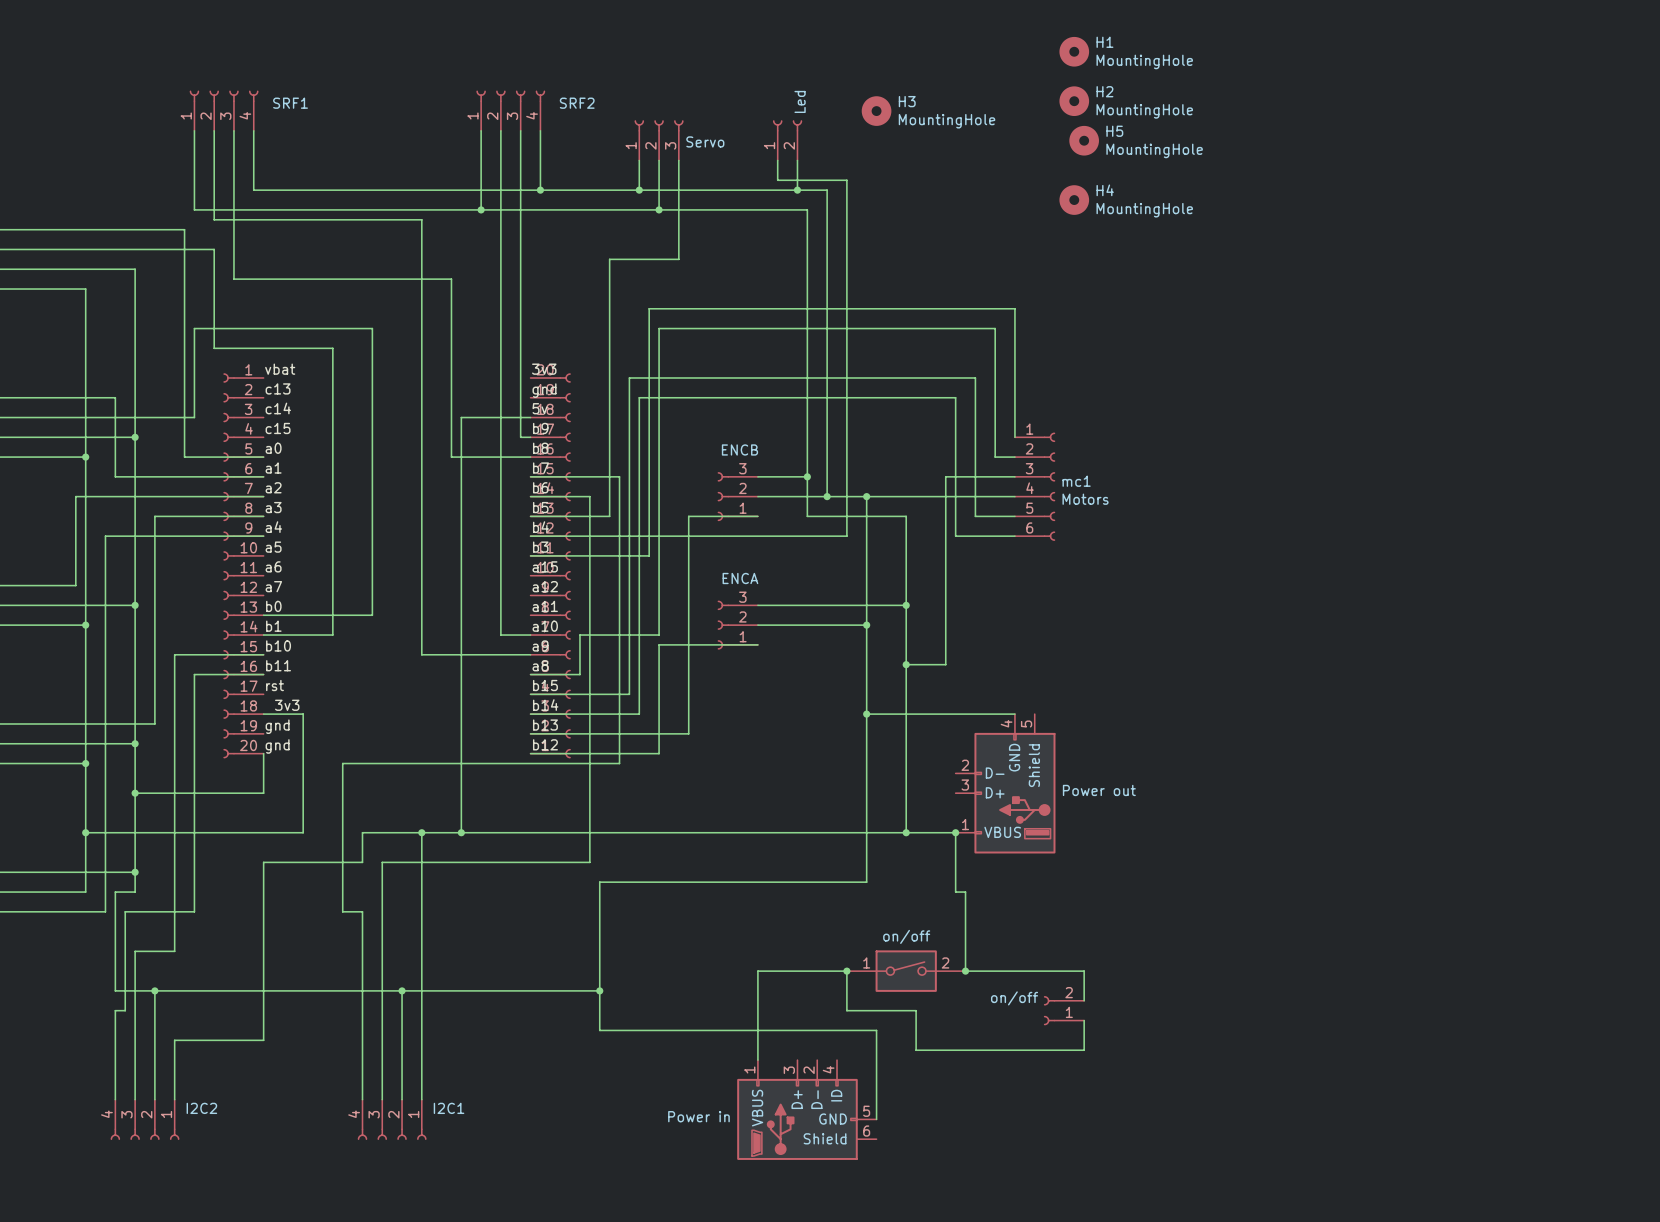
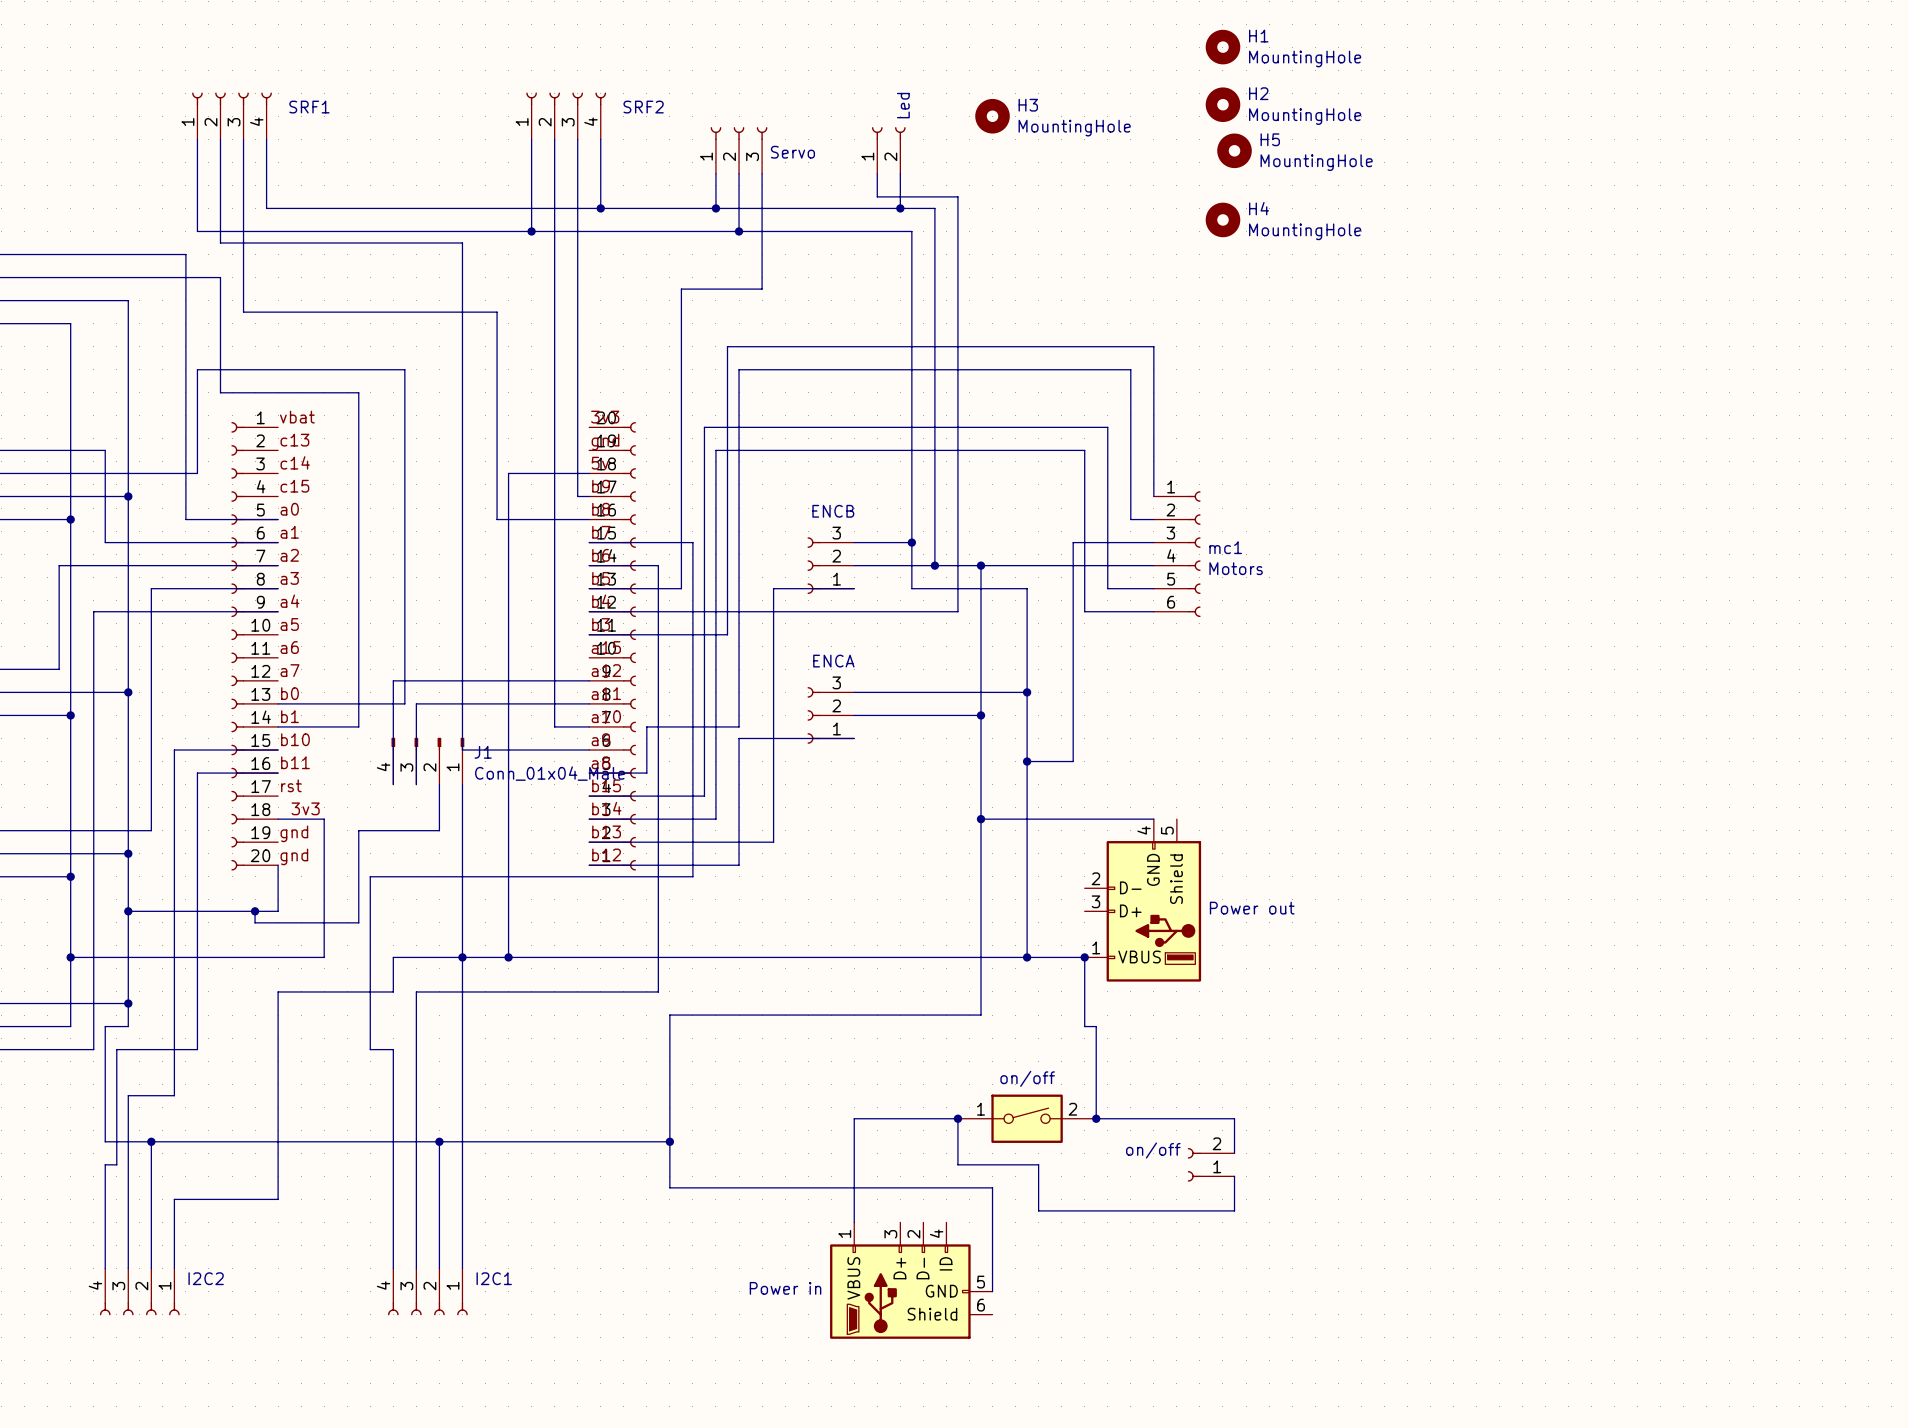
wire: none -> (589, 680) (393, 680) (393, 784)
wire: none -> (589, 703) (416, 703) (416, 784)
J1: none -> Conn_01x04_Male (427, 761)
wire: none -> (439, 784) (439, 830) (358, 830) (358, 922) (255, 922) (255, 911)
wire: none -> (462, 784) (462, 957)
junction: none -> (255, 911)

